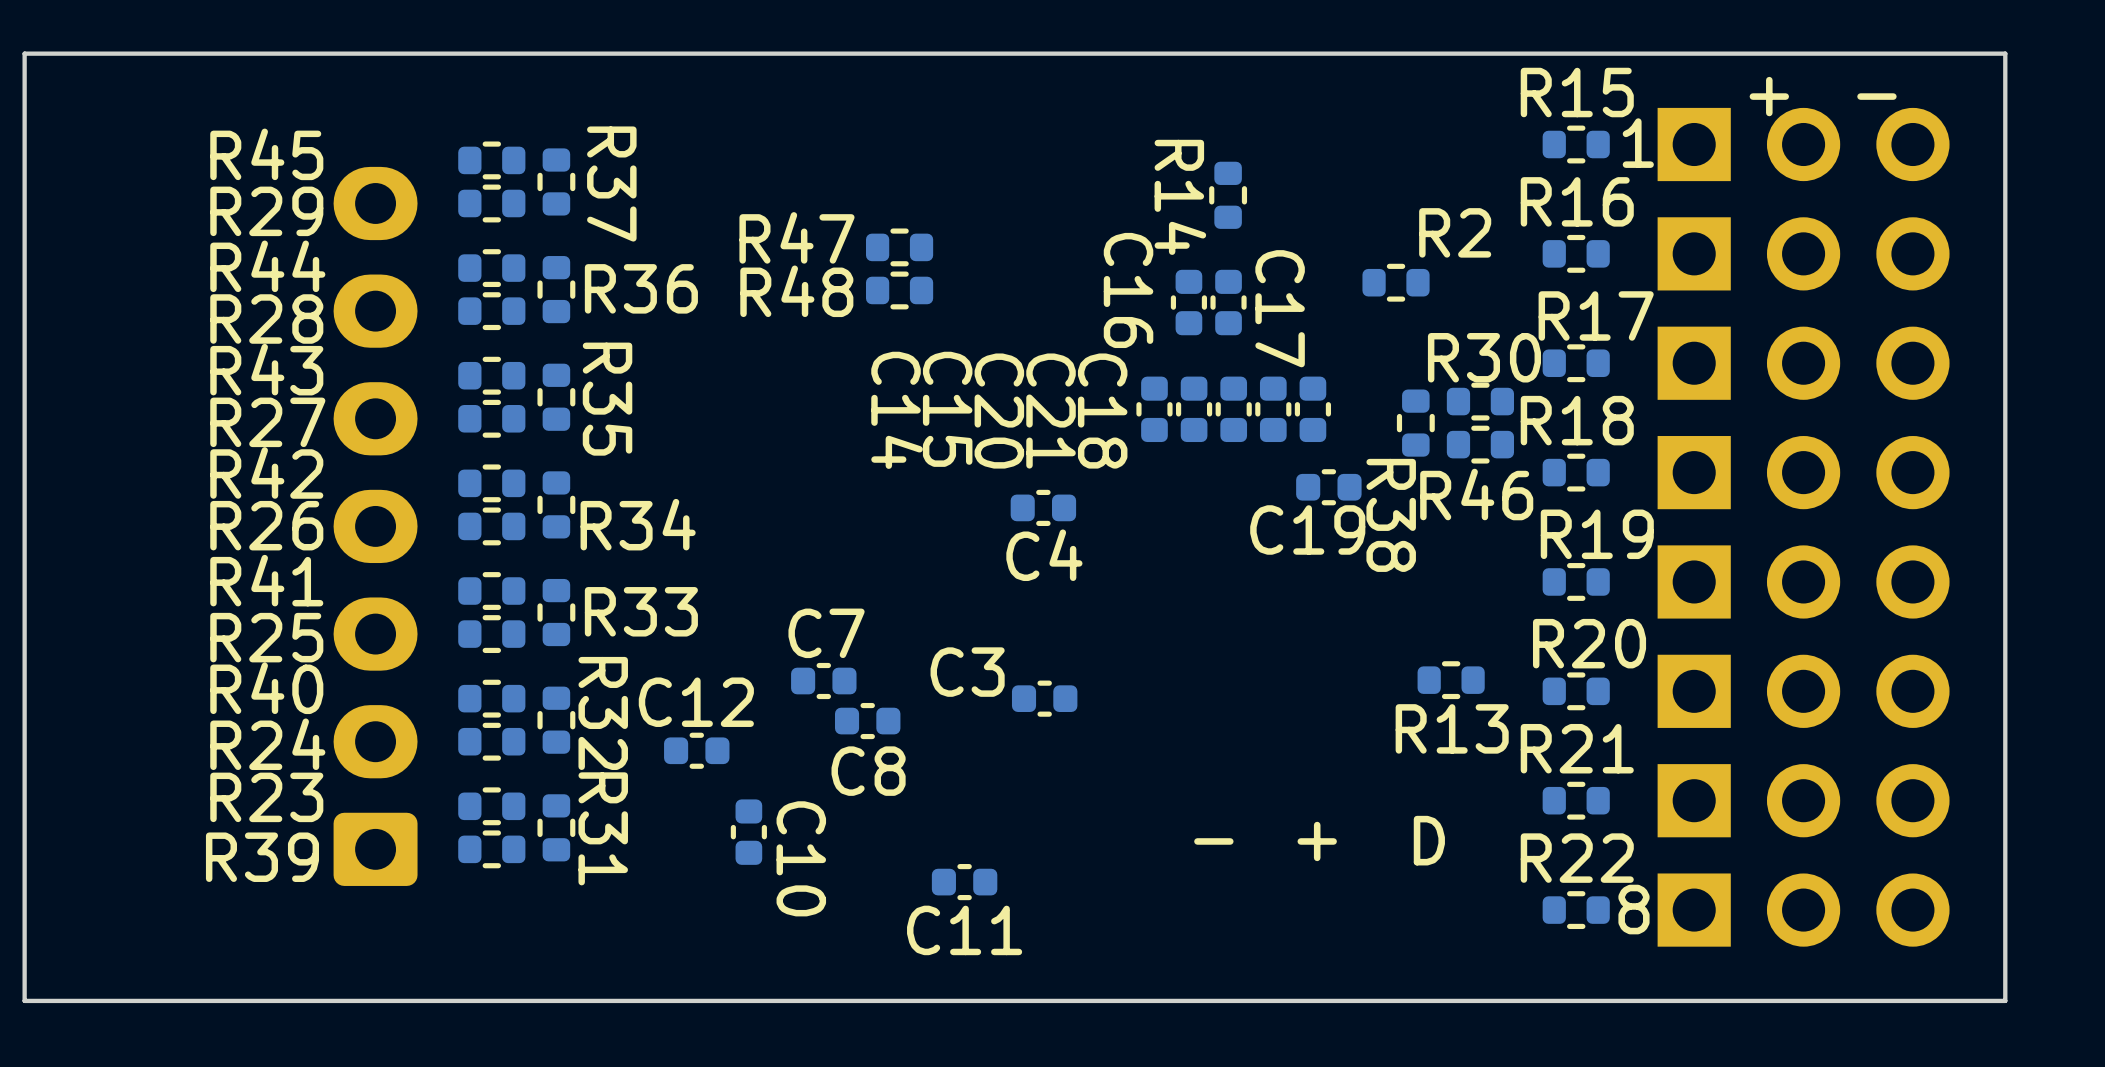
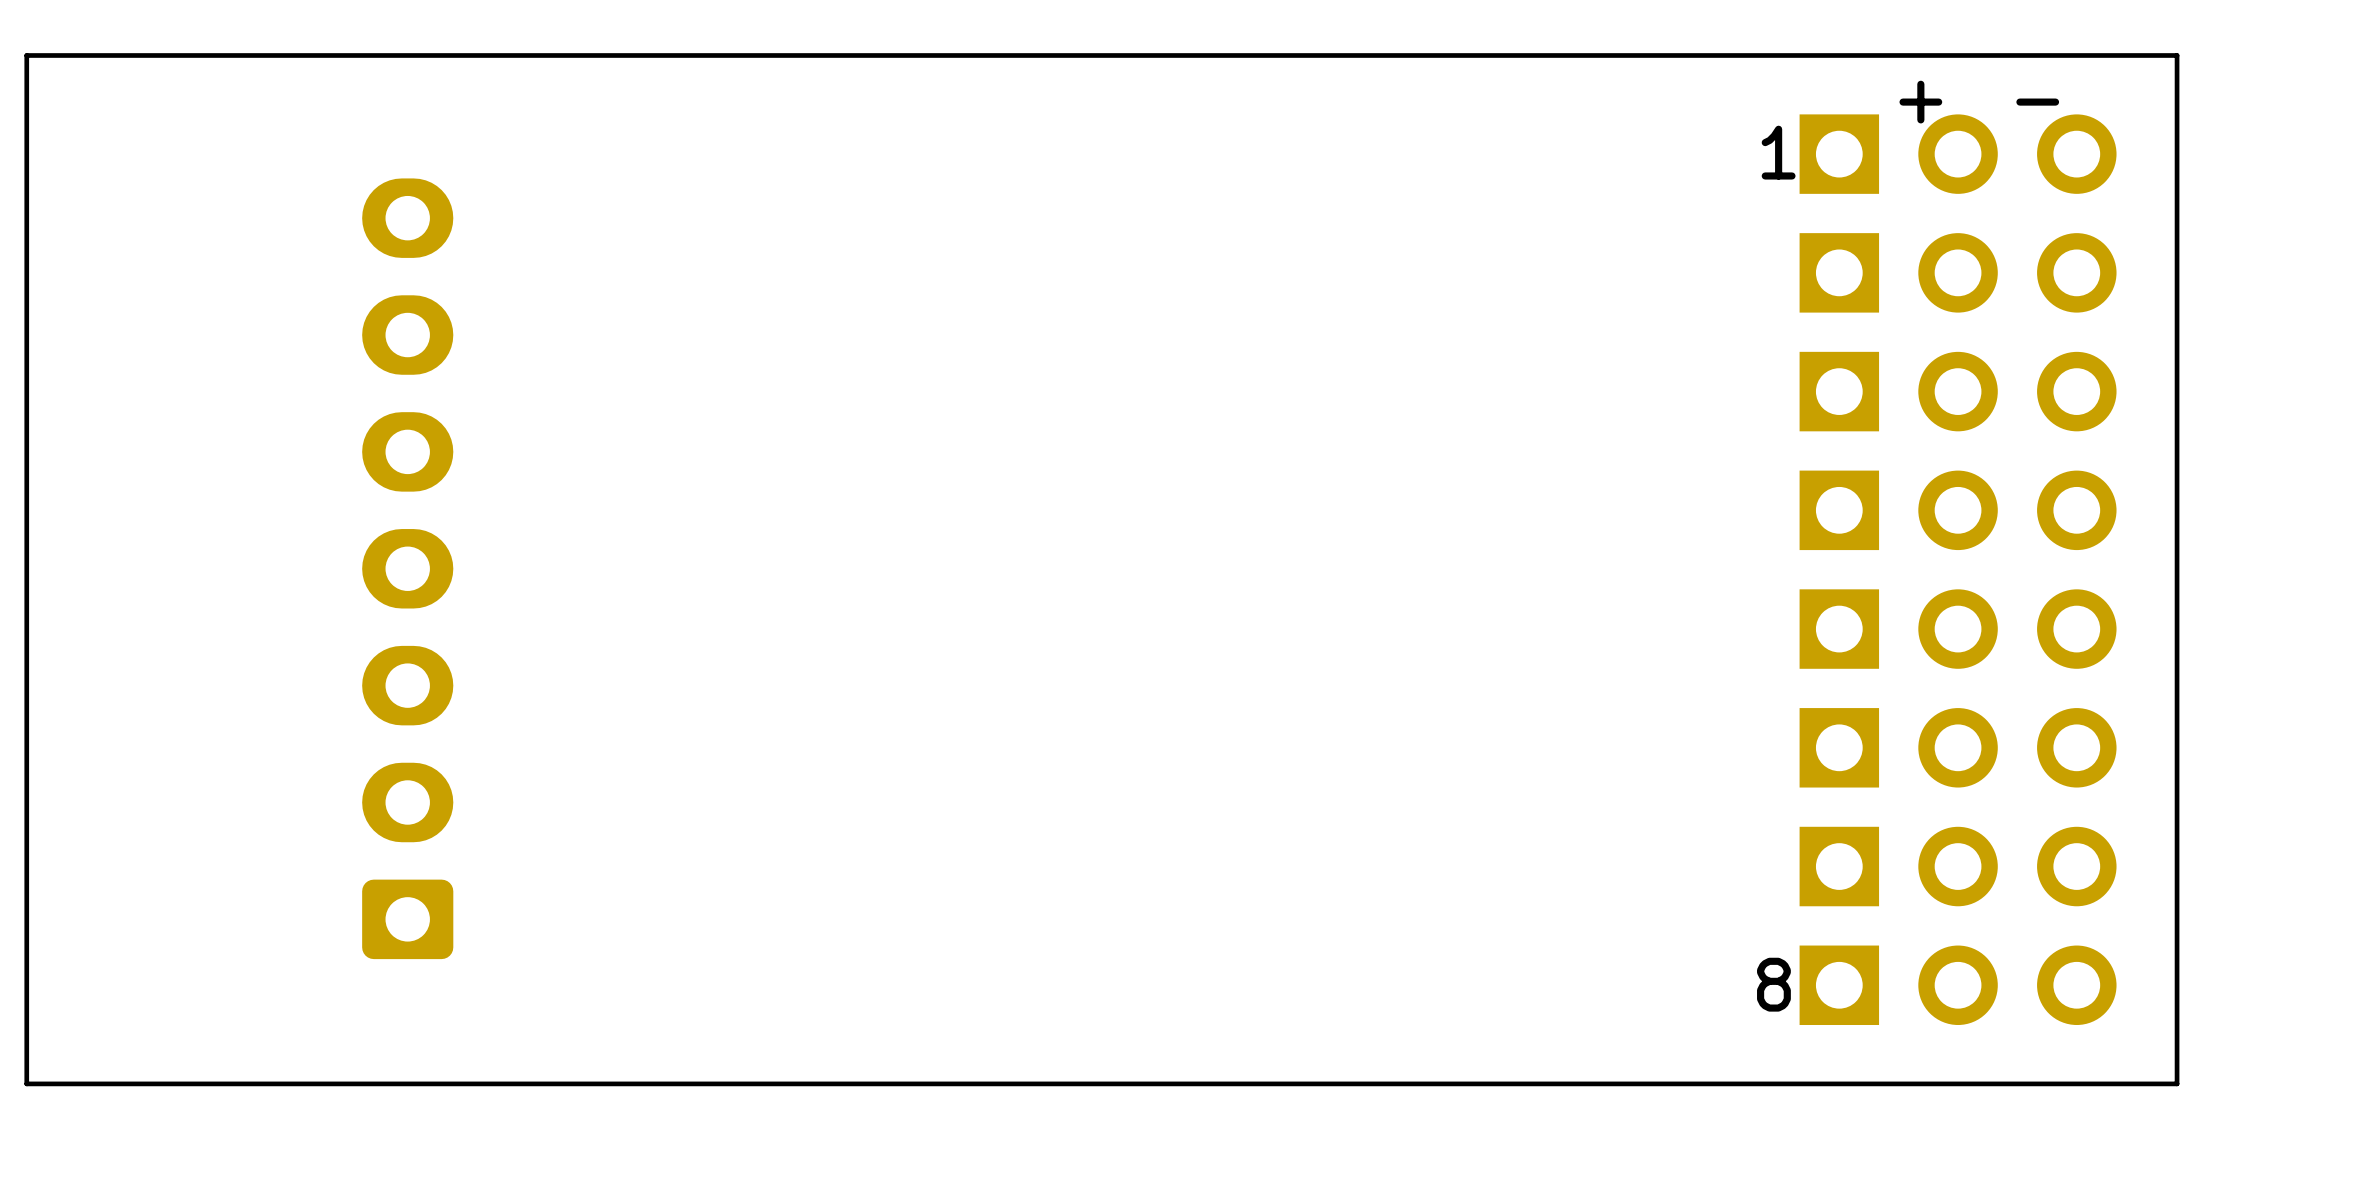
R15: (1576, 144) -> none
R45: (491, 160) -> none
R37: (556, 181) -> none
R14: (1228, 195) -> none
R29: (491, 203) -> none
R47: (899, 247) -> none
R16: (1576, 253) -> none
R44: (491, 268) -> none
R2: (1396, 282) -> none
R36: (556, 289) -> none
R48: (899, 290) -> none
C16: (1188, 302) -> none
C17: (1228, 302) -> none
R28: (491, 311) -> none
R17: (1576, 363) -> none
R43: (491, 375) -> none
R35: (556, 397) -> none
R30: (1480, 401) -> none
C14: (1154, 409) -> none
C15: (1194, 409) -> none
C20: (1233, 409) -> none
C21: (1273, 409) -> none
C18: (1312, 409) -> none
R27: (491, 418) -> none
R38: (1415, 423) -> none
R46: (1480, 444) -> none
R18: (1576, 472) -> none
R42: (491, 483) -> none
C19: (1328, 487) -> none
R34: (556, 504) -> none
C4: (1043, 507) -> none
R26: (491, 526) -> none
R19: (1576, 581) -> none
R41: (491, 591) -> none
R33: (556, 612) -> none
R25: (491, 634) -> none
R13: (1451, 680) -> none
C7: (823, 681) -> none
R20: (1576, 691) -> none
R40: (491, 698) -> none
C3: (1044, 698) -> none
R32: (556, 720) -> none
C8: (867, 721) -> none
R24: (491, 741) -> none
C12: (696, 750) -> none
R21: (1576, 800) -> none
R39: (491, 806) -> none
R31: (556, 827) -> none
C10: (748, 832) -> none
text: D (1429, 840) -> none
text: - (1213, 841) -> none
text: + (1317, 841) -> none
R23: (491, 849) -> none
C11: (964, 882) -> none
R22: (1576, 910) -> none

